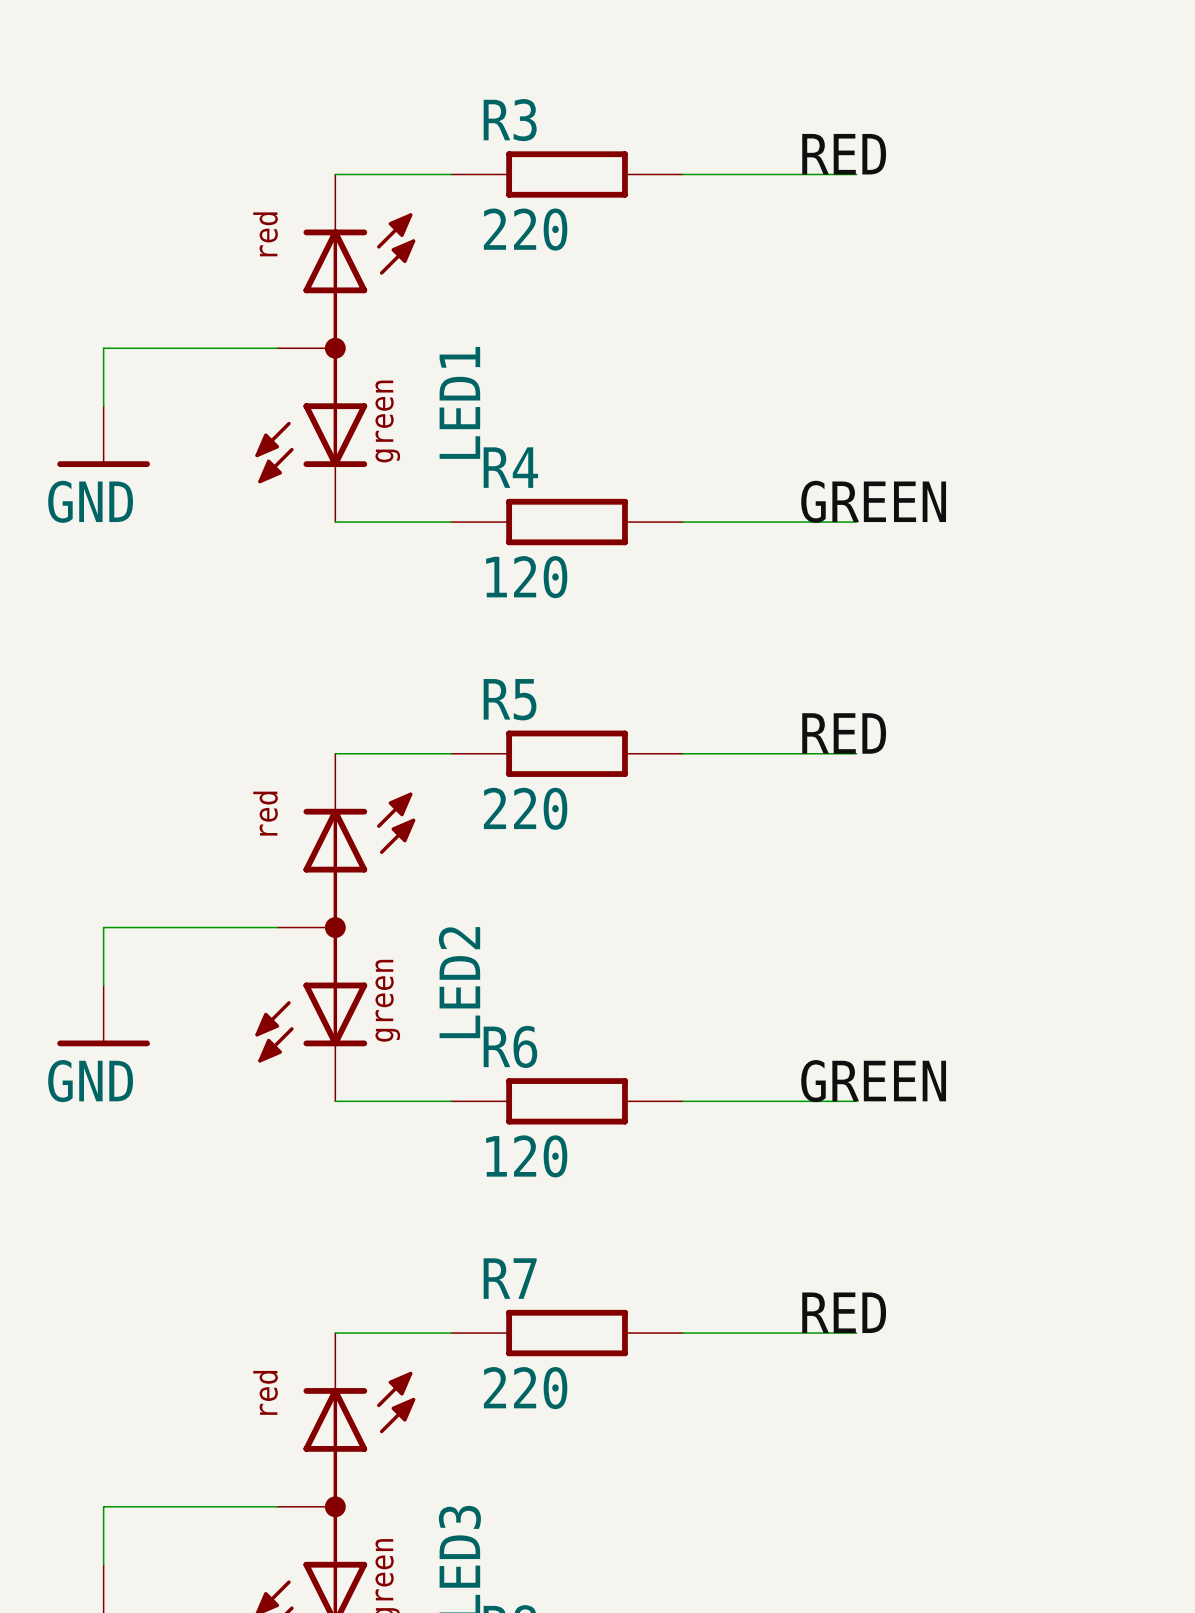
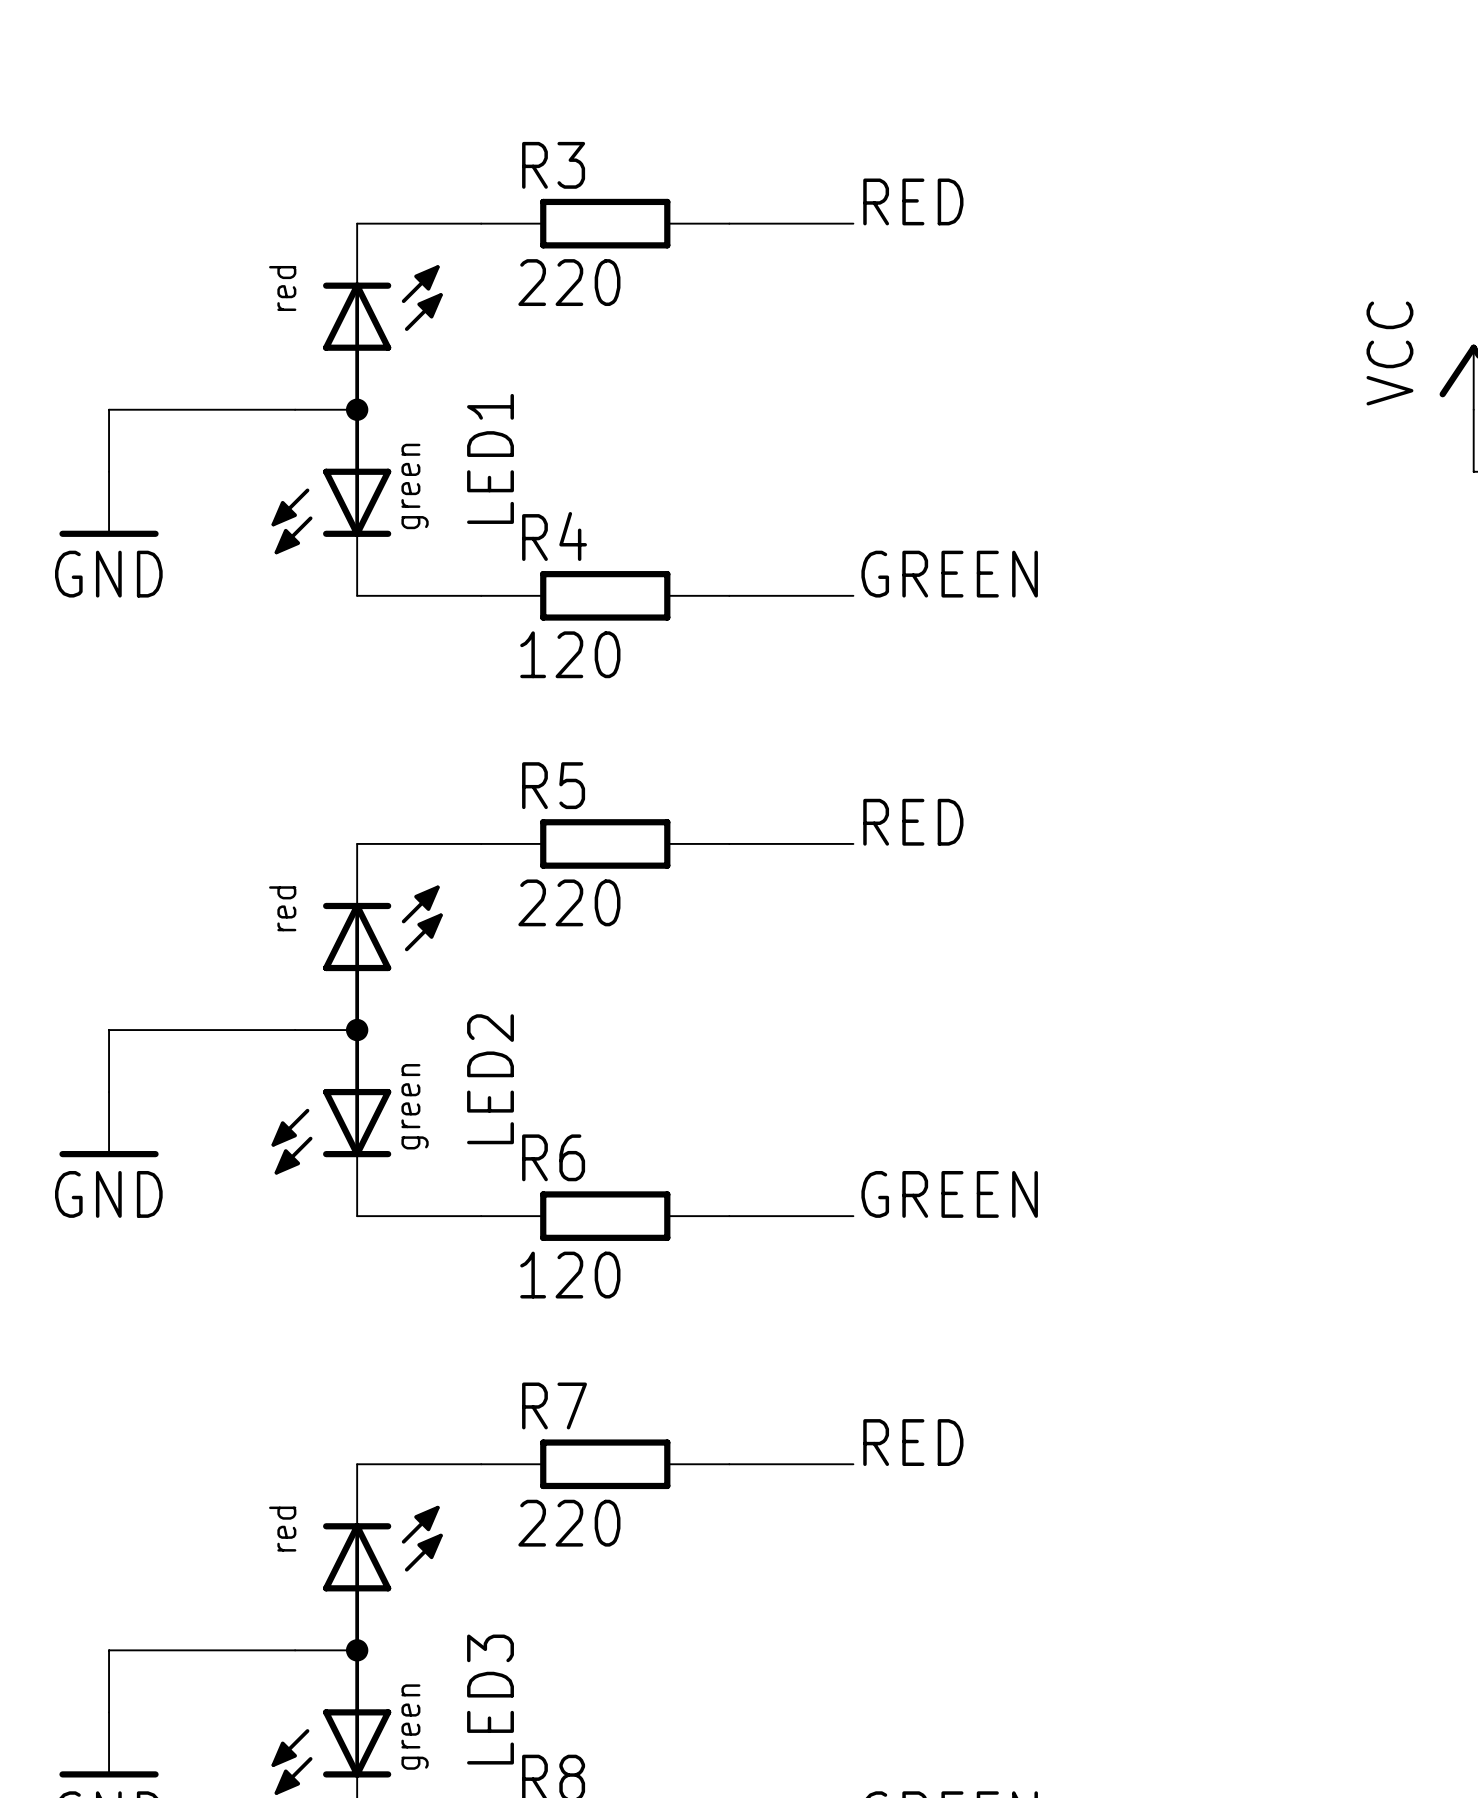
wire: (798, 174) (856, 174) -> none
wire: (798, 522) (856, 522) -> none
wire: (798, 753) (856, 753) -> none
wire: (798, 1101) (856, 1101) -> none
wire: (798, 1333) (856, 1333) -> none

